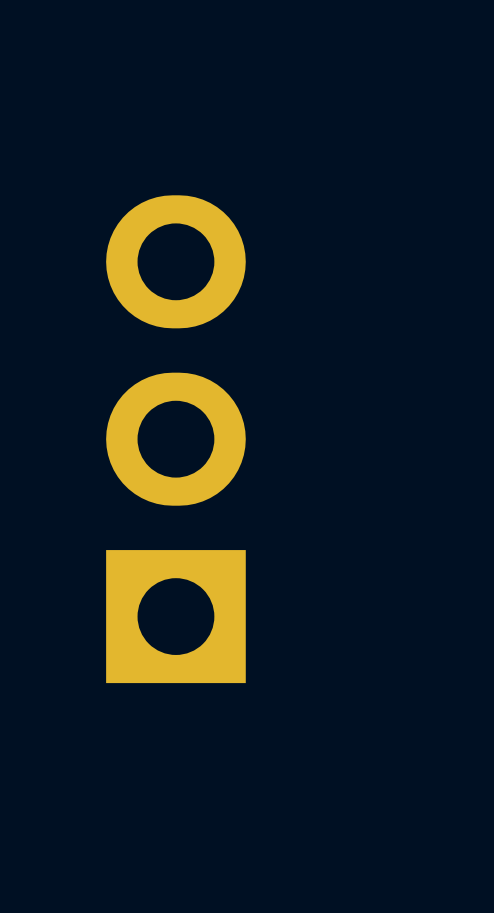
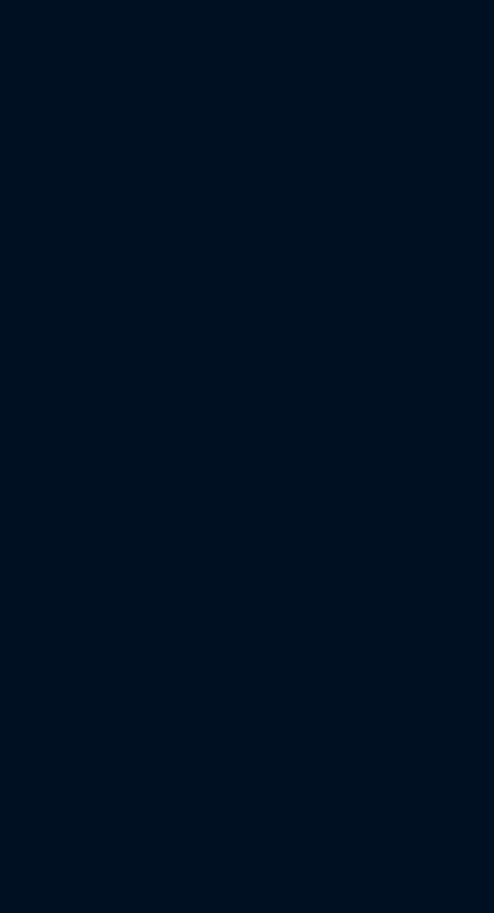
part: (175, 439) -> none

